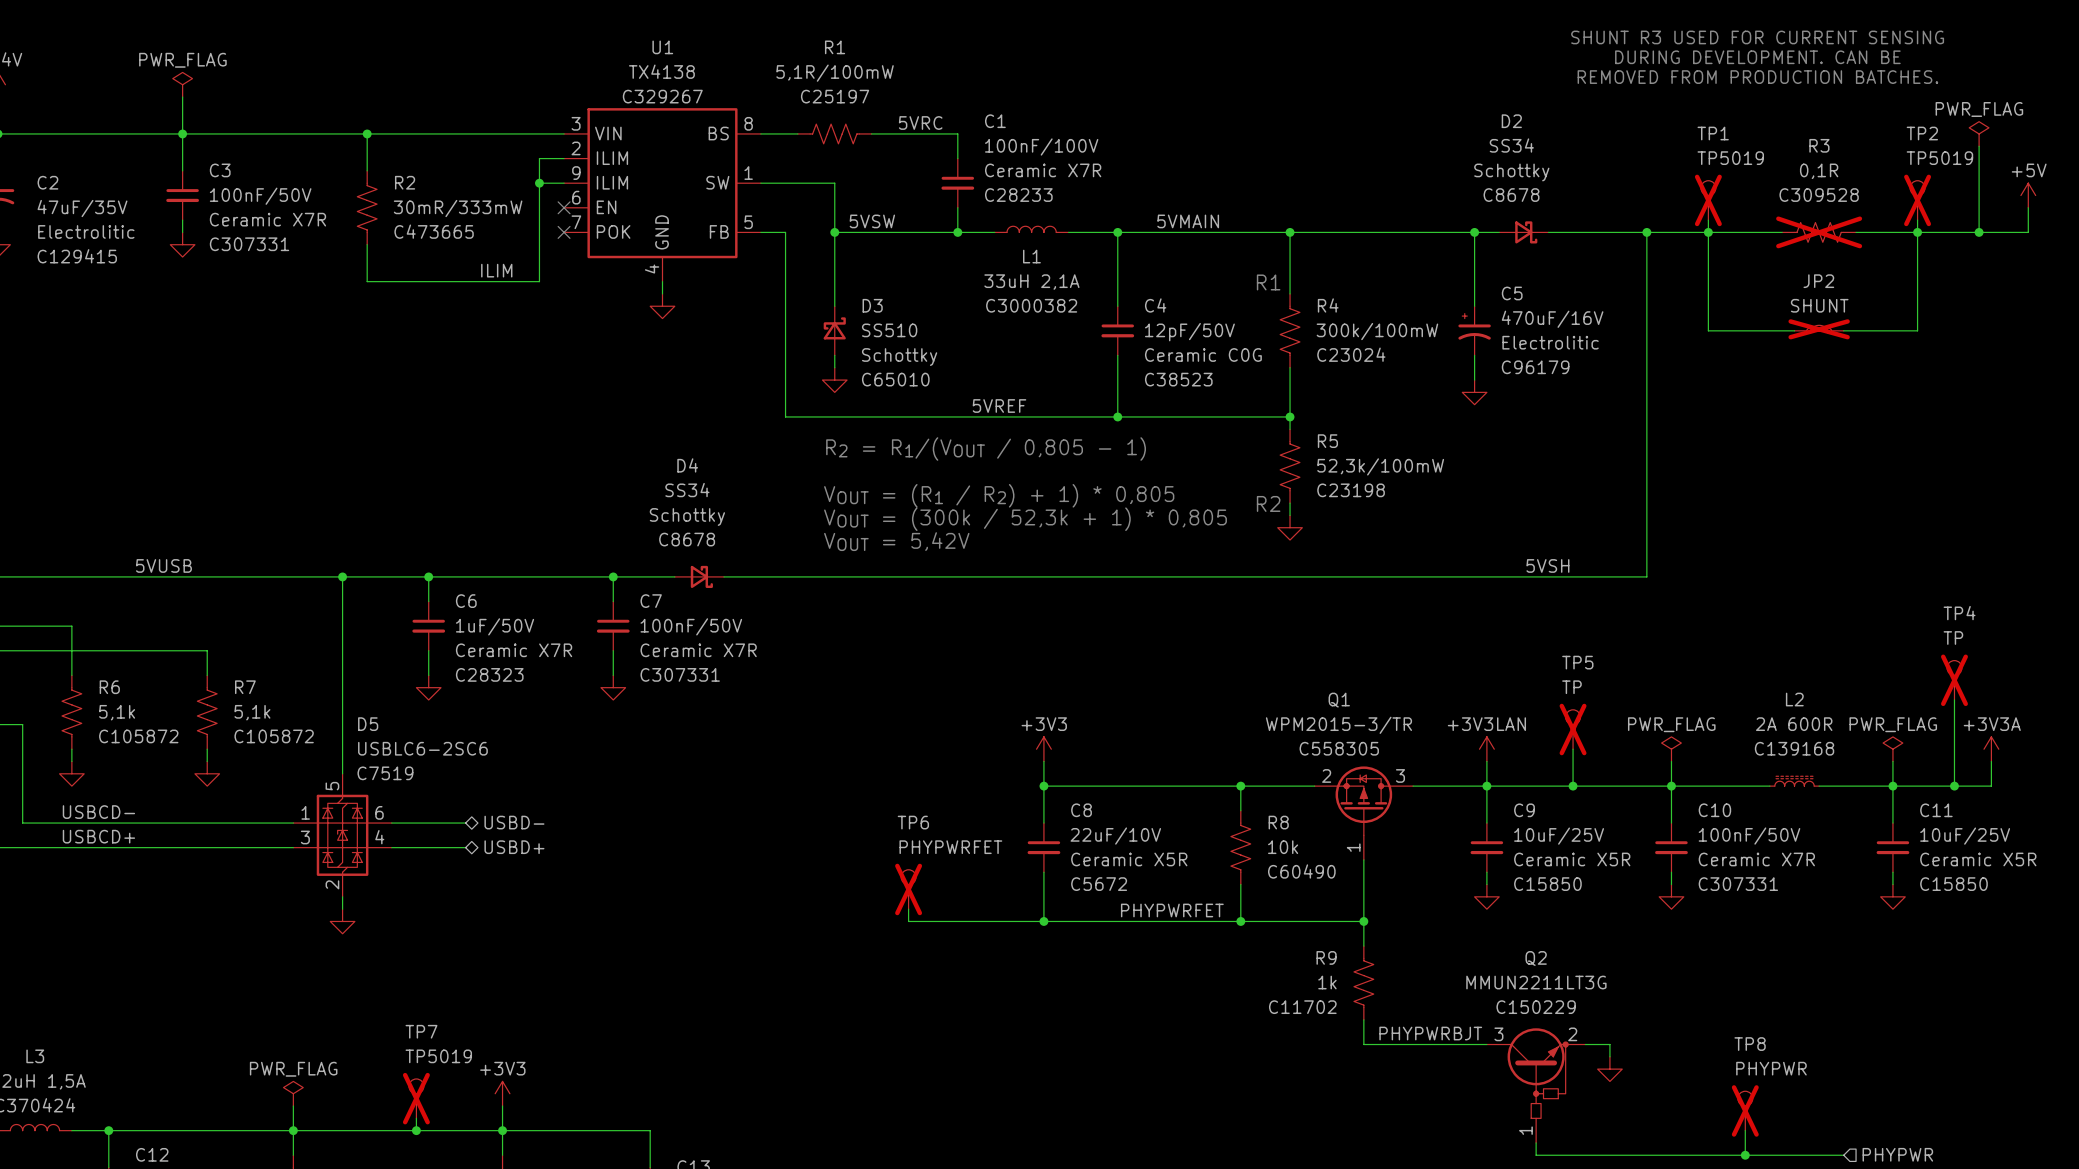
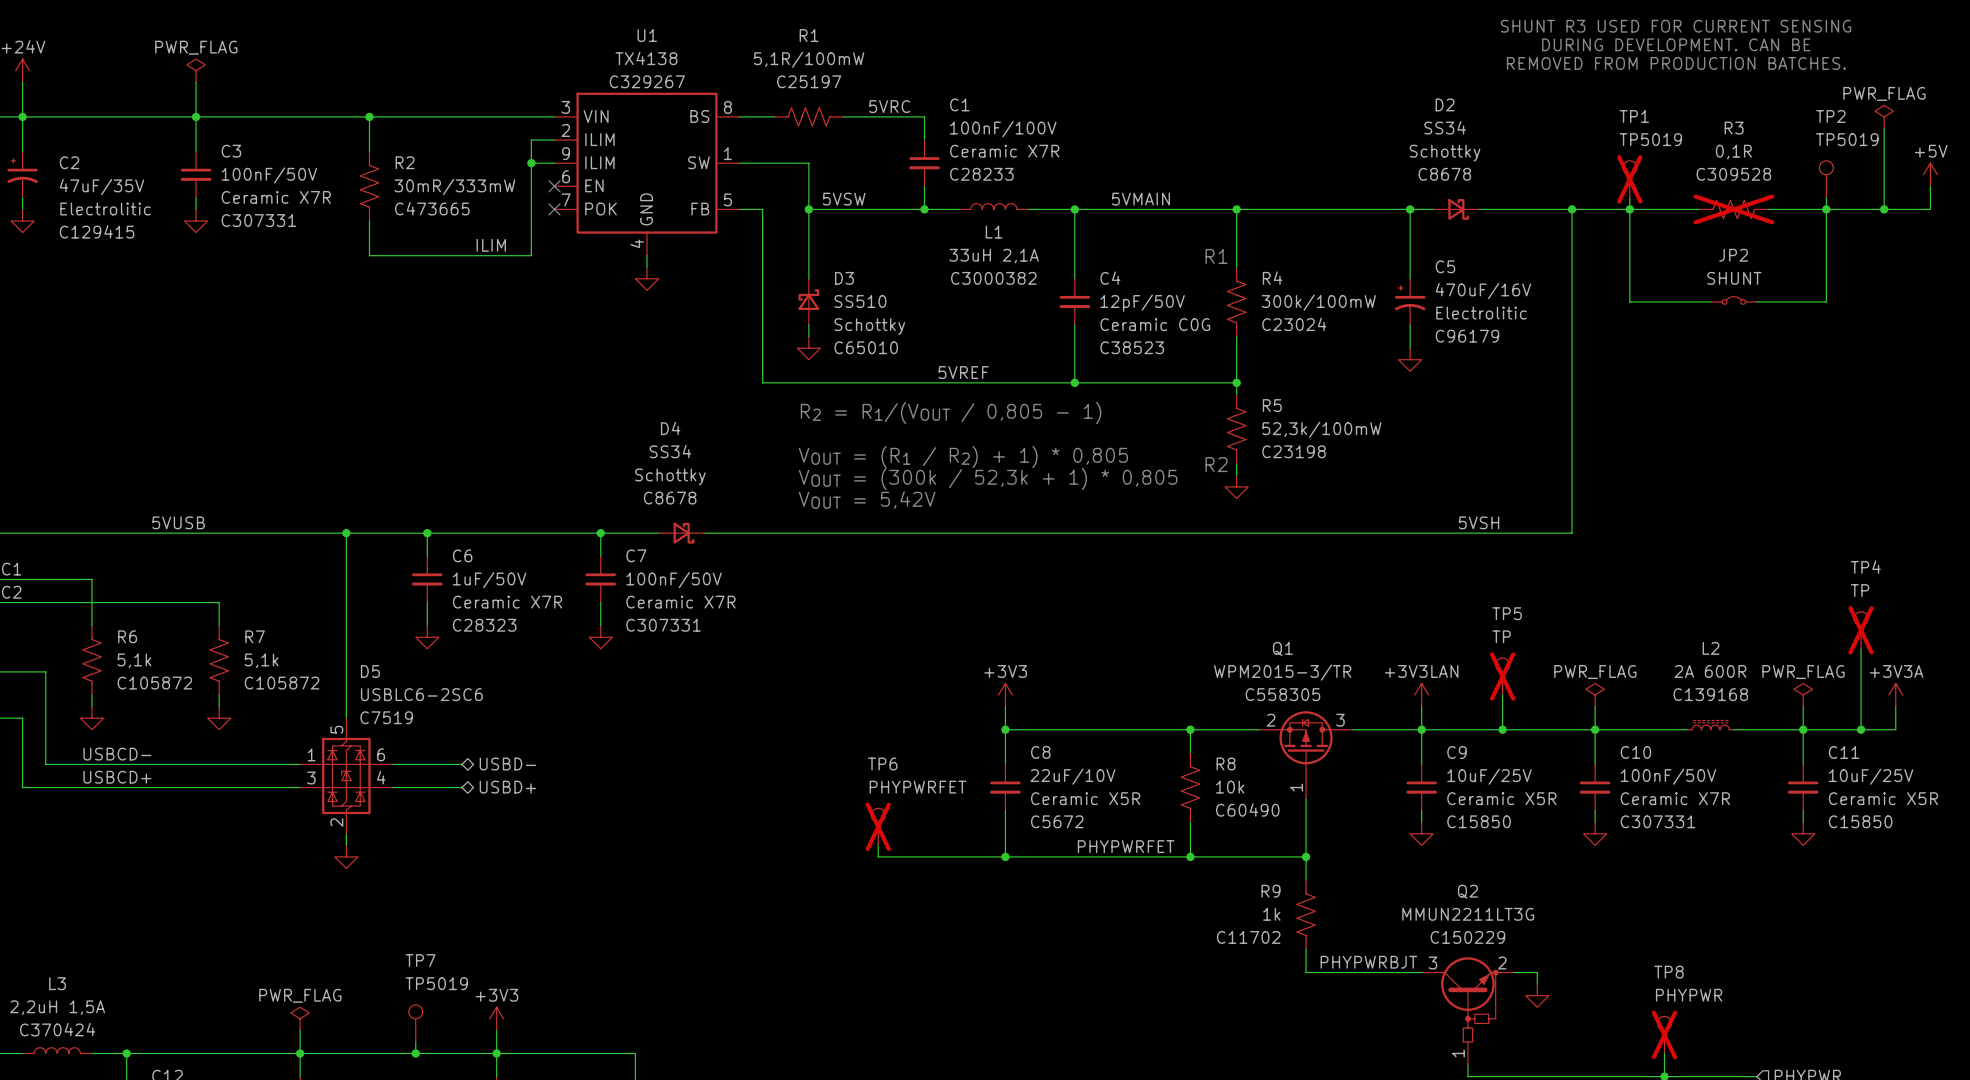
TP2 do-not-place cross: (1917, 200) -> none
JP2 do-not-place cross: (1819, 329) -> none
TP7 do-not-place cross: (416, 1098) -> none

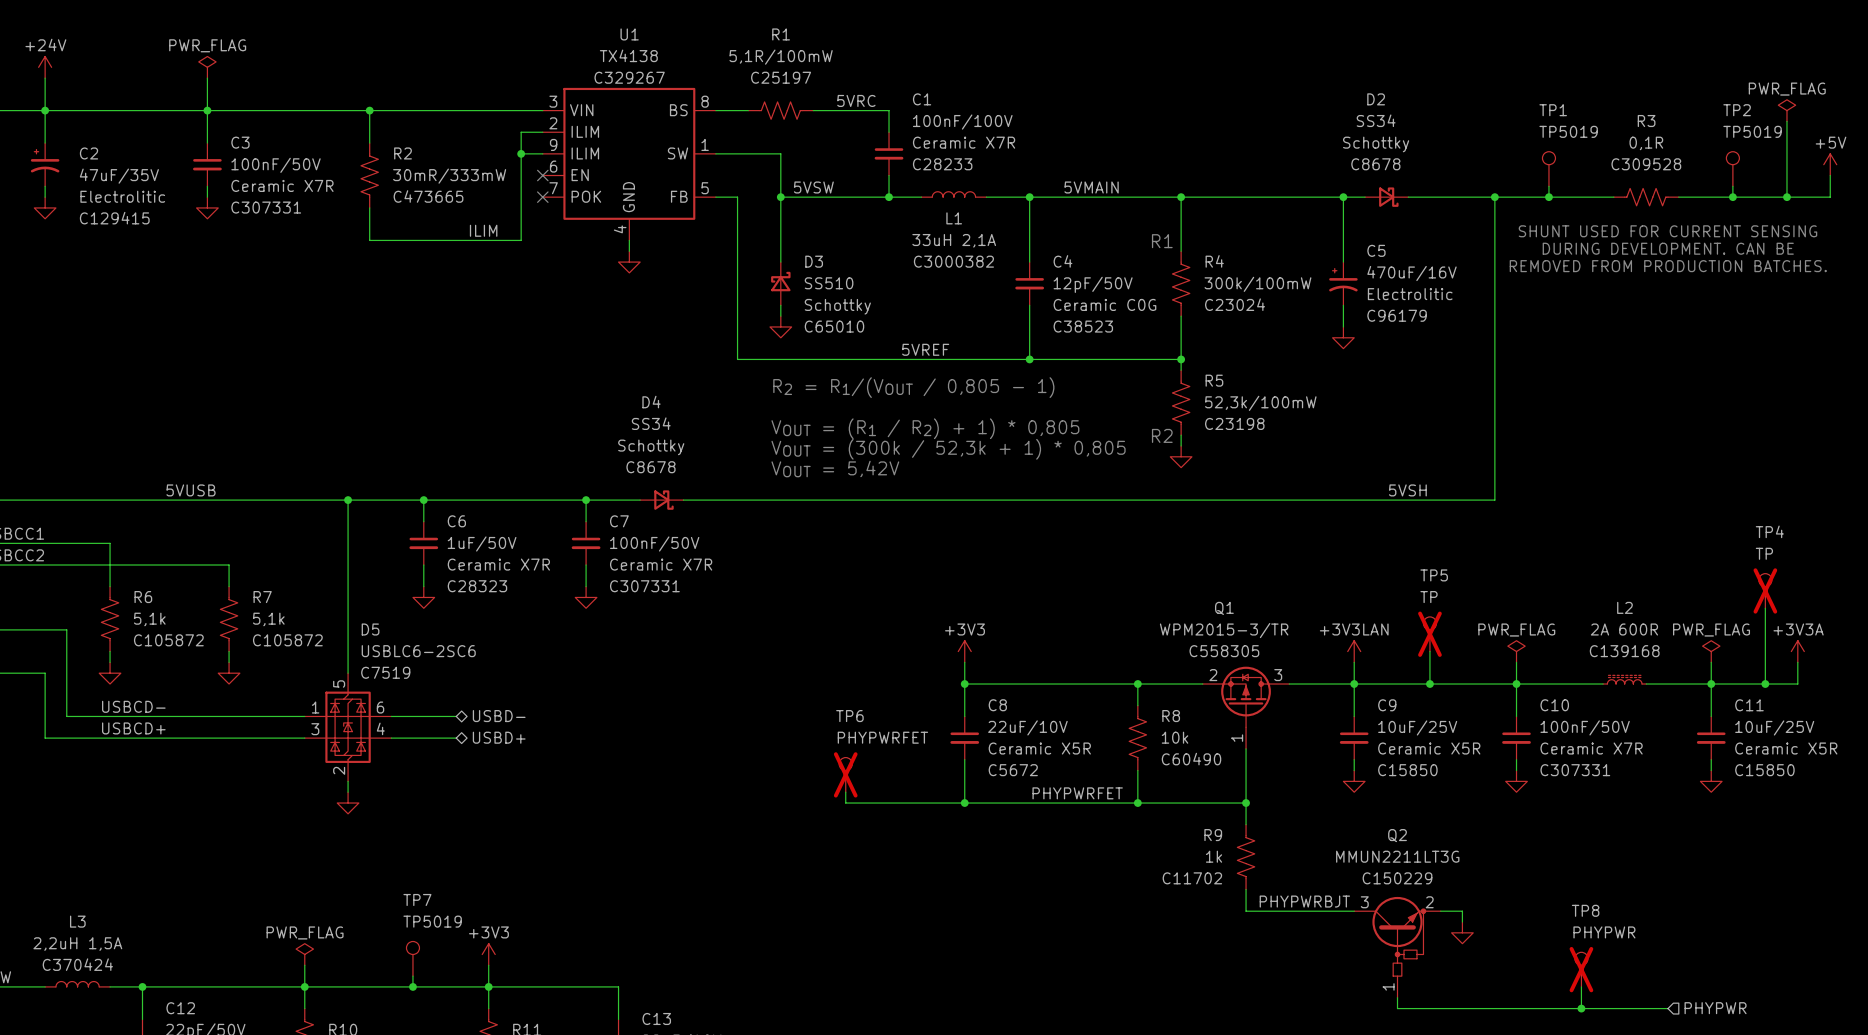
text: SHUNT R3 USED FOR CURRENT SENSING (1676, 26) -> none
text: DURING DEVELOPMENT. CAN BE (1676, 44) -> none
text: REMOVED FROM PRODUCTION BATCHES. (1676, 63) -> none
TP1 do-not-place cross: (1629, 179) -> none
wire: (1629, 209) (1629, 301) (1710, 301) -> none
R3 do-not-place cross: (1733, 209) -> none
wire: (1826, 209) (1826, 301) (1756, 301) -> none
text: none -> SHUNT USED FOR CURRENT SENSING (1667, 231)
text: none -> DURING DEVELOPMENT. CAN BE (1668, 248)
text: none -> REMOVED FROM PRODUCTION BATCHES. (1668, 266)
JP2: SHUNT (1733, 300) -> none

